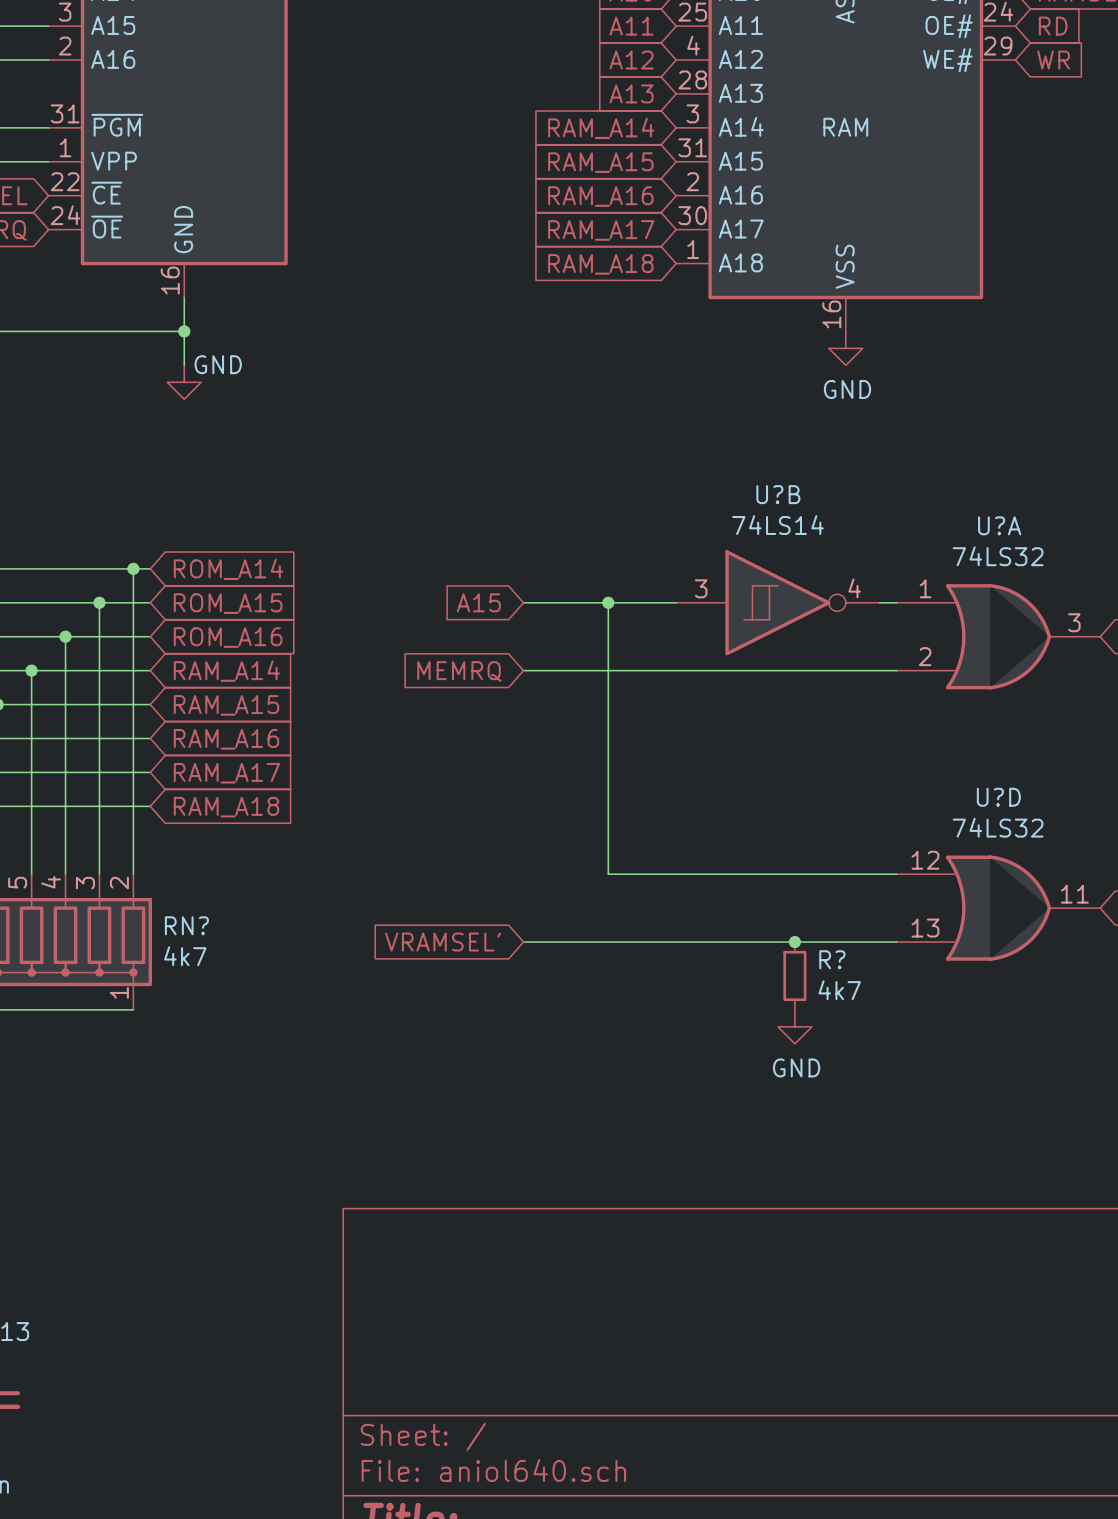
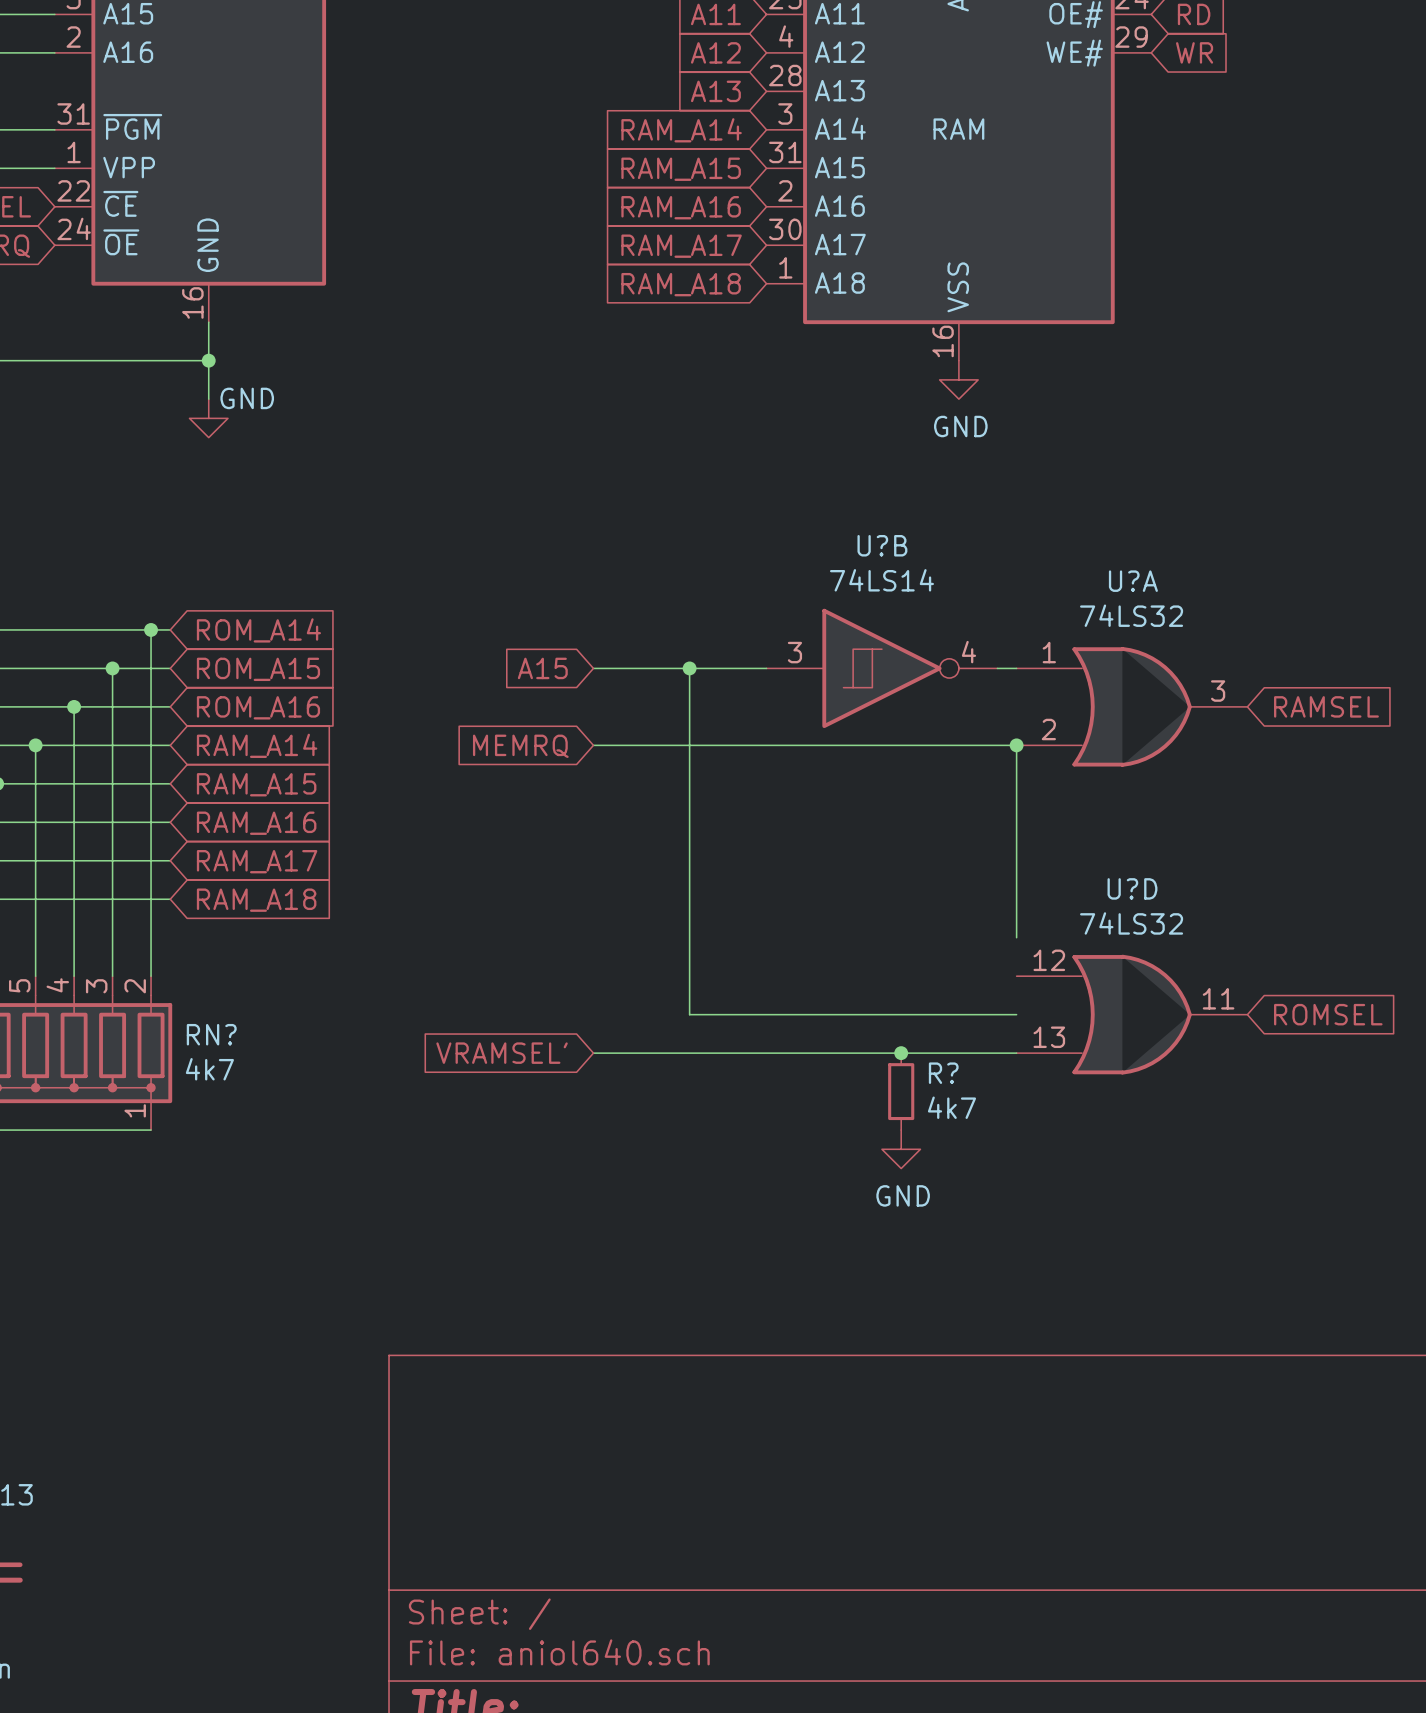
wire: none -> (1016, 745) (1016, 937)
junction: none -> (1016, 745)
wire: (608, 874) (896, 874) -> (689, 976) (689, 1014) (1016, 1014)

